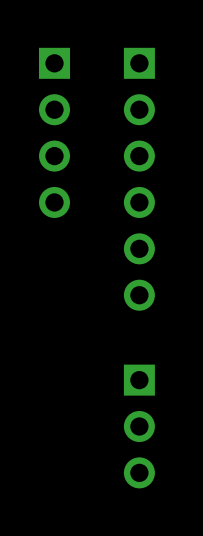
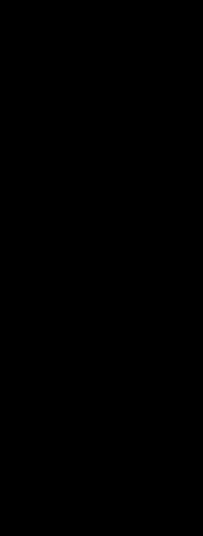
part: (54, 132) -> none
part: (139, 179) -> none
part: (139, 426) -> none

